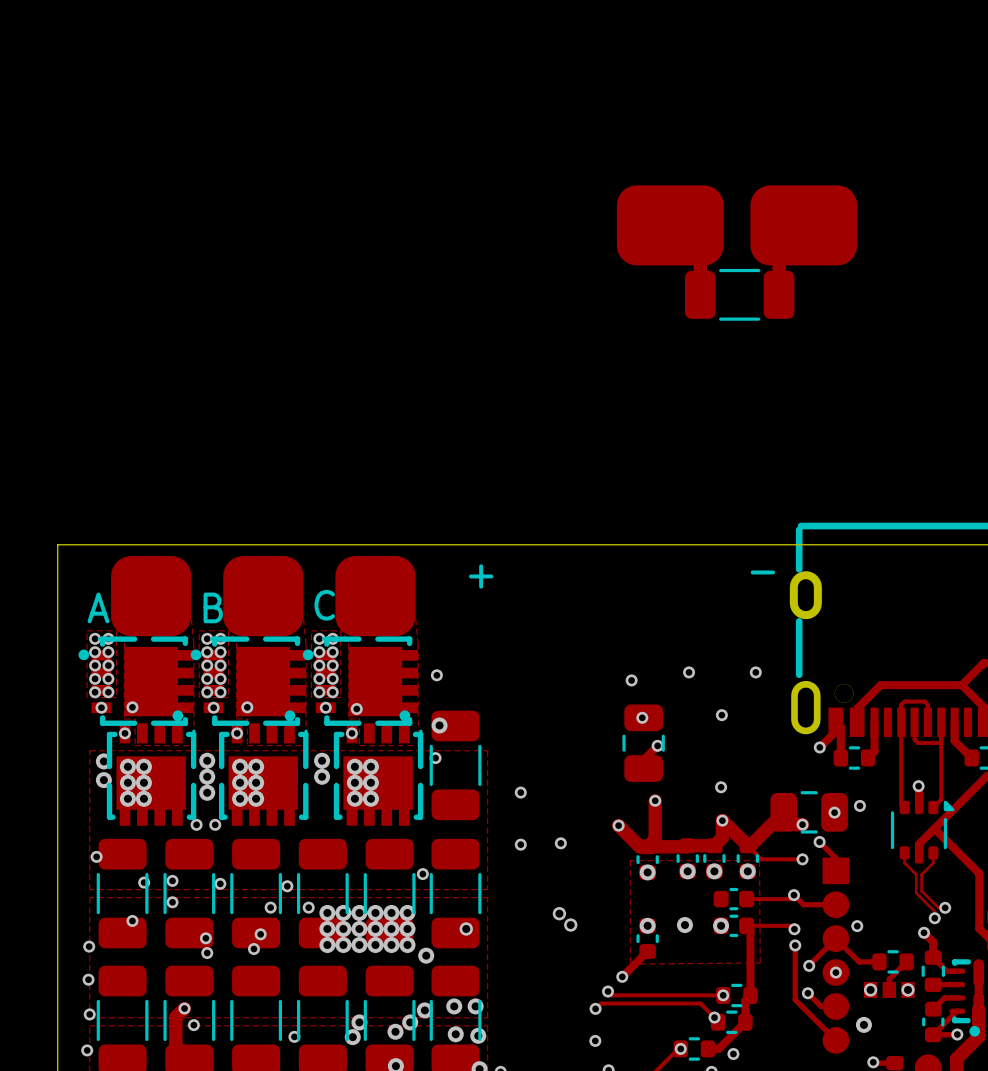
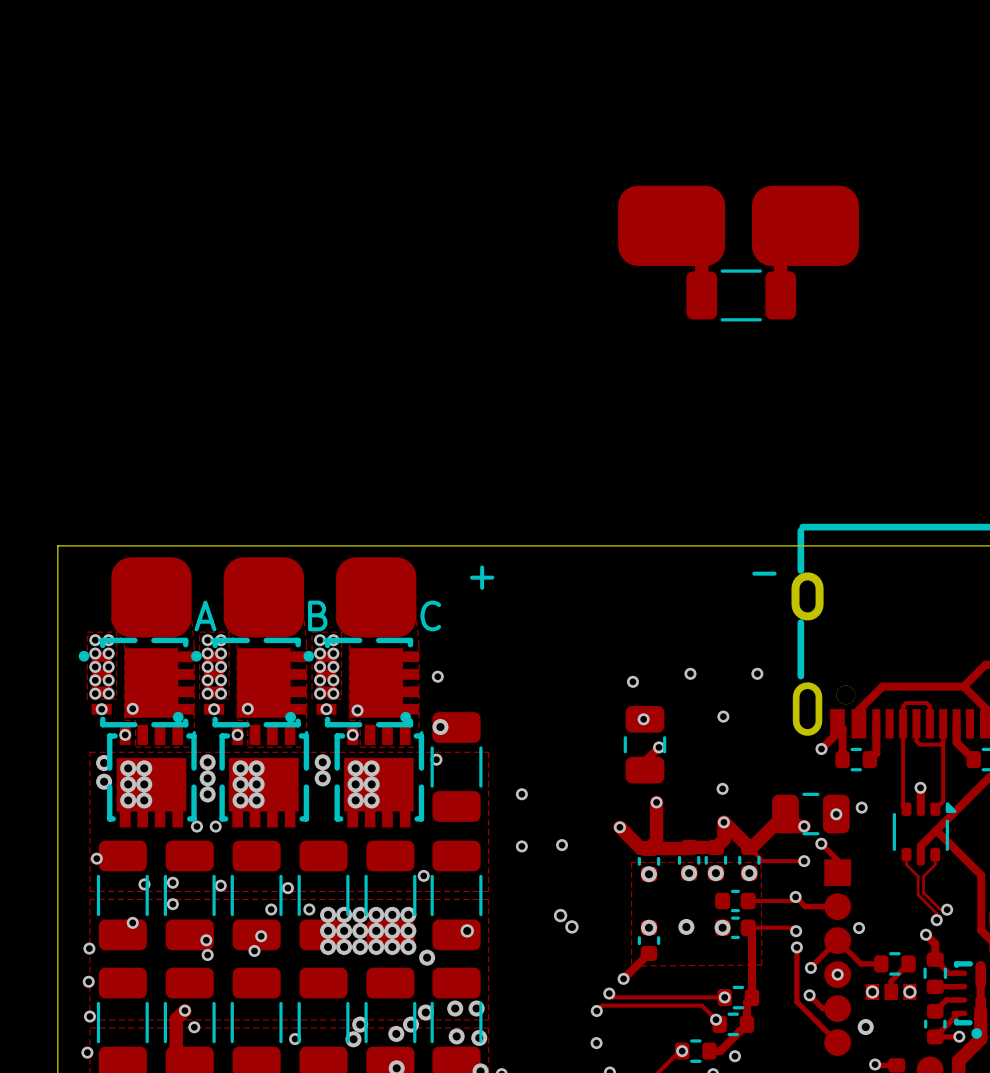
text position: C (324, 605) -> C (430, 615)
text position: A (98, 607) -> A (205, 615)
text position: B (213, 607) -> B (317, 615)

